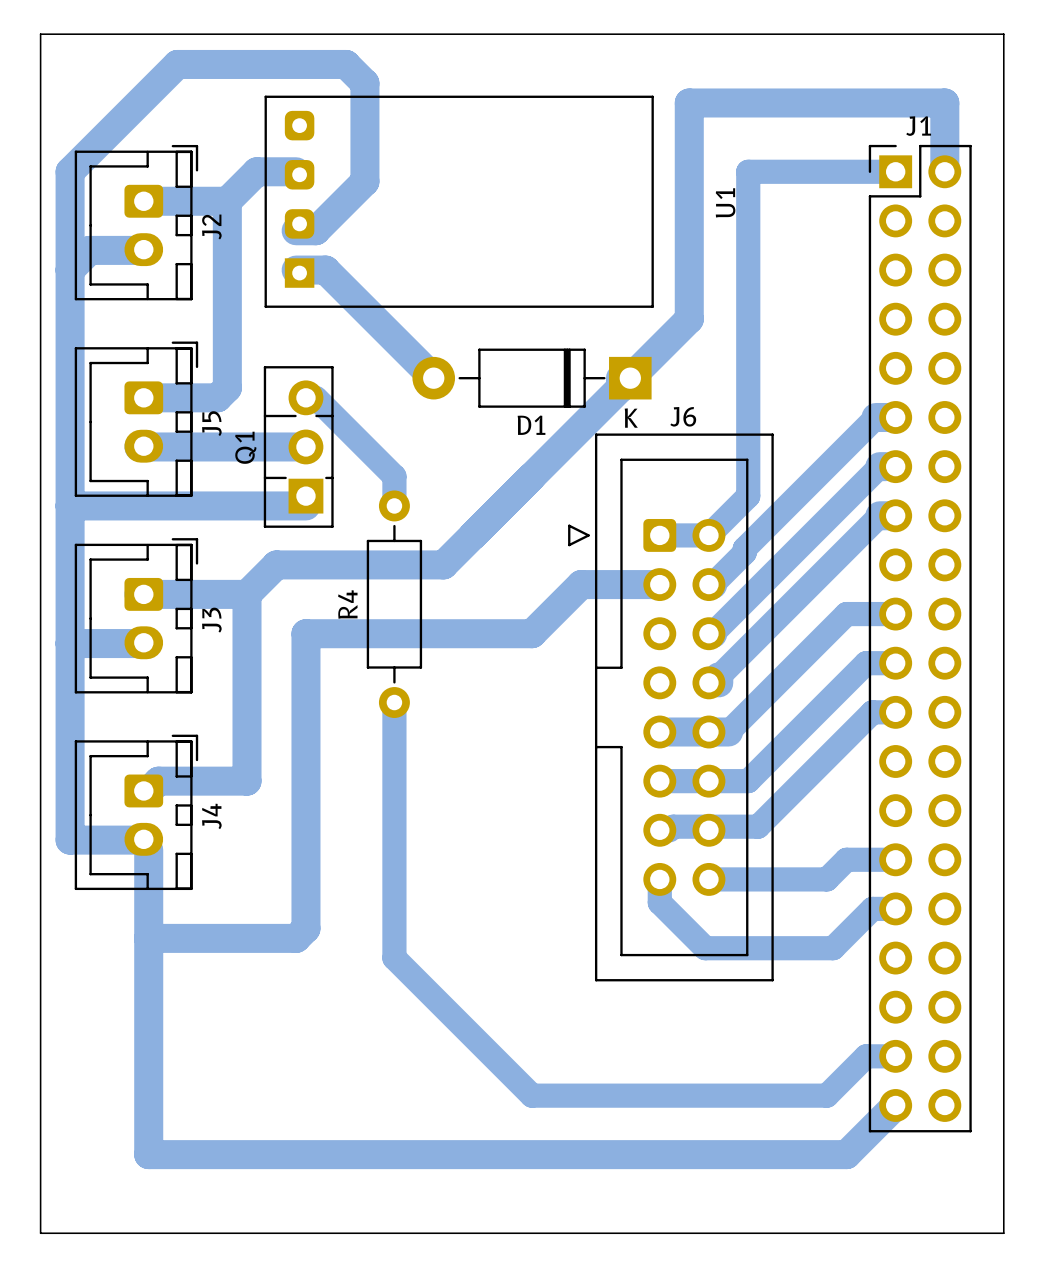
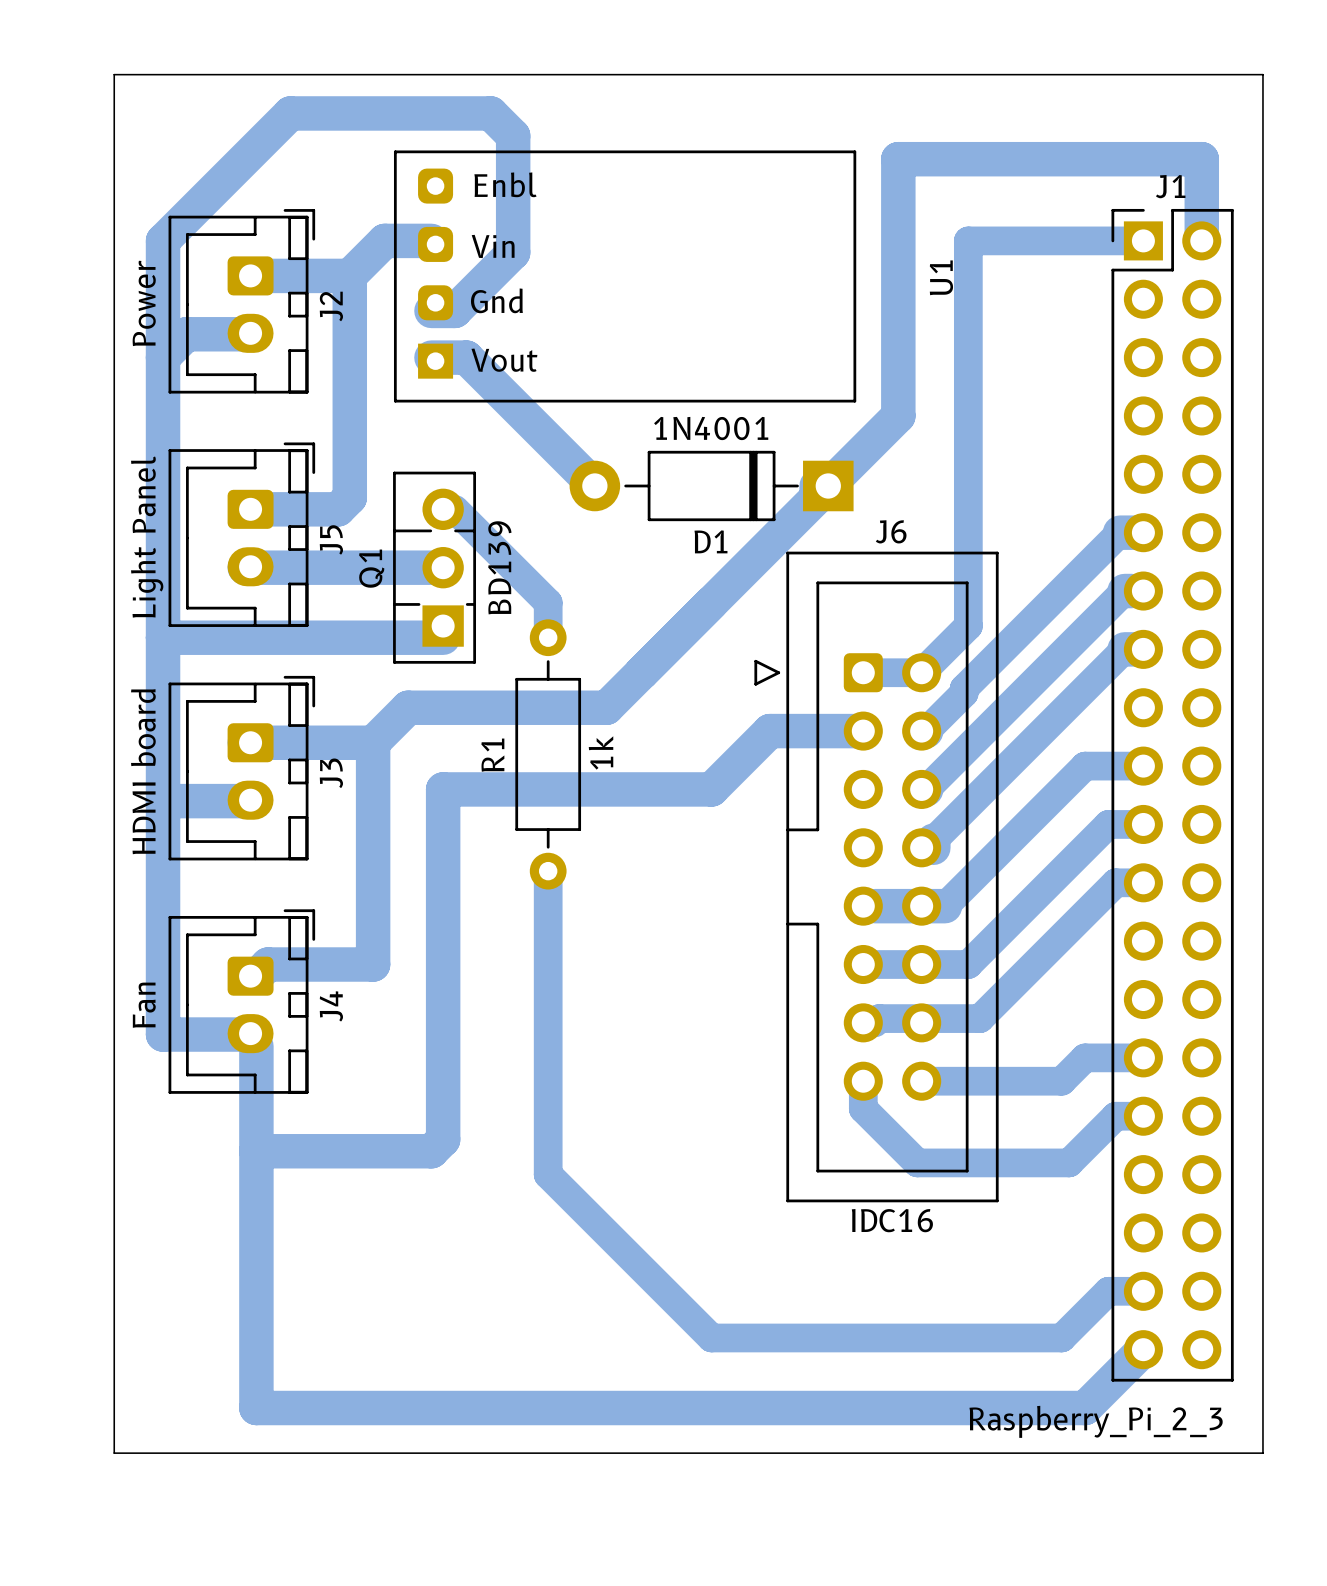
board edge: (40, 34) (40, 1233) (1003, 1233) (1003, 34) (40, 34) -> (114, 74) (114, 1453) (1262, 1453) (1262, 74) (114, 74)
U1 text: none -> Enbl (505, 184)
U1 text: none -> Vin (493, 246)
U1 text: none -> Gnd (496, 300)
J2 value: none -> Power (144, 303)
U1 text: none -> Vout (504, 360)
D1 value: none -> 1N4001 (711, 428)
D1 text: K (631, 418) -> none
J5 value: none -> Light Panel (147, 537)
Q1 value: none -> BD139 (499, 567)
R4 value: none -> 1k (601, 752)
R4 name: R4 (347, 604) -> R1 (492, 755)
J3 value: none -> HDMI board (143, 771)
J4 value: none -> Fan (144, 1005)
J6 value: none -> IDC16 (892, 1220)
J1 value: none -> Raspberry_Pi_2_3 (1096, 1421)

